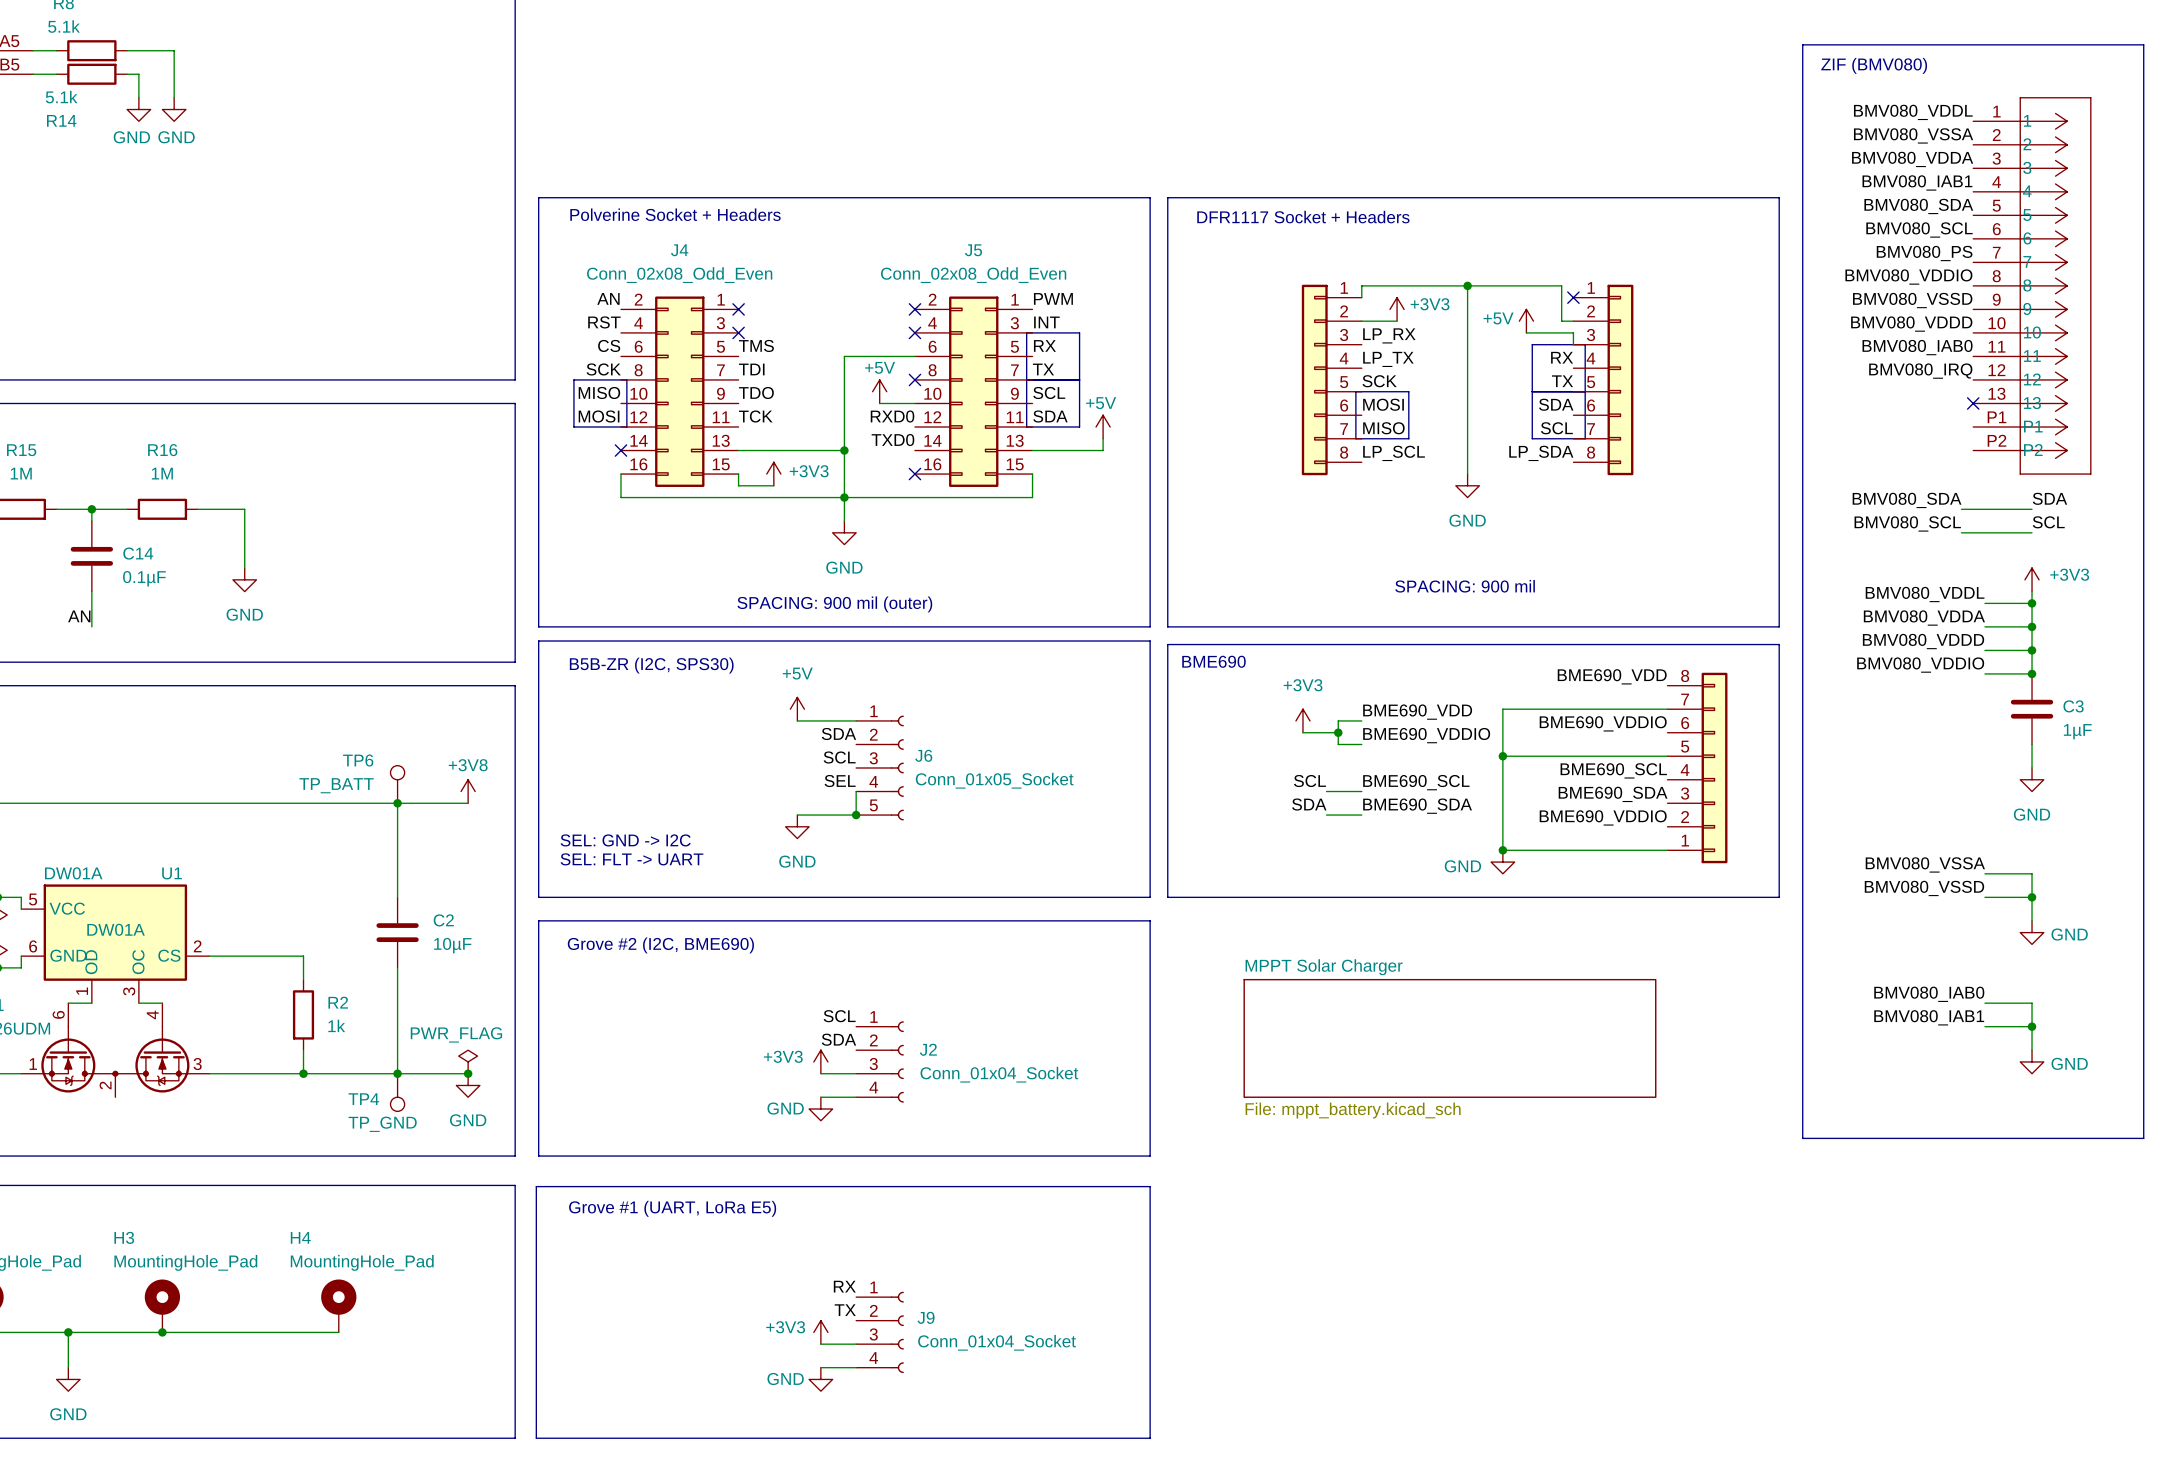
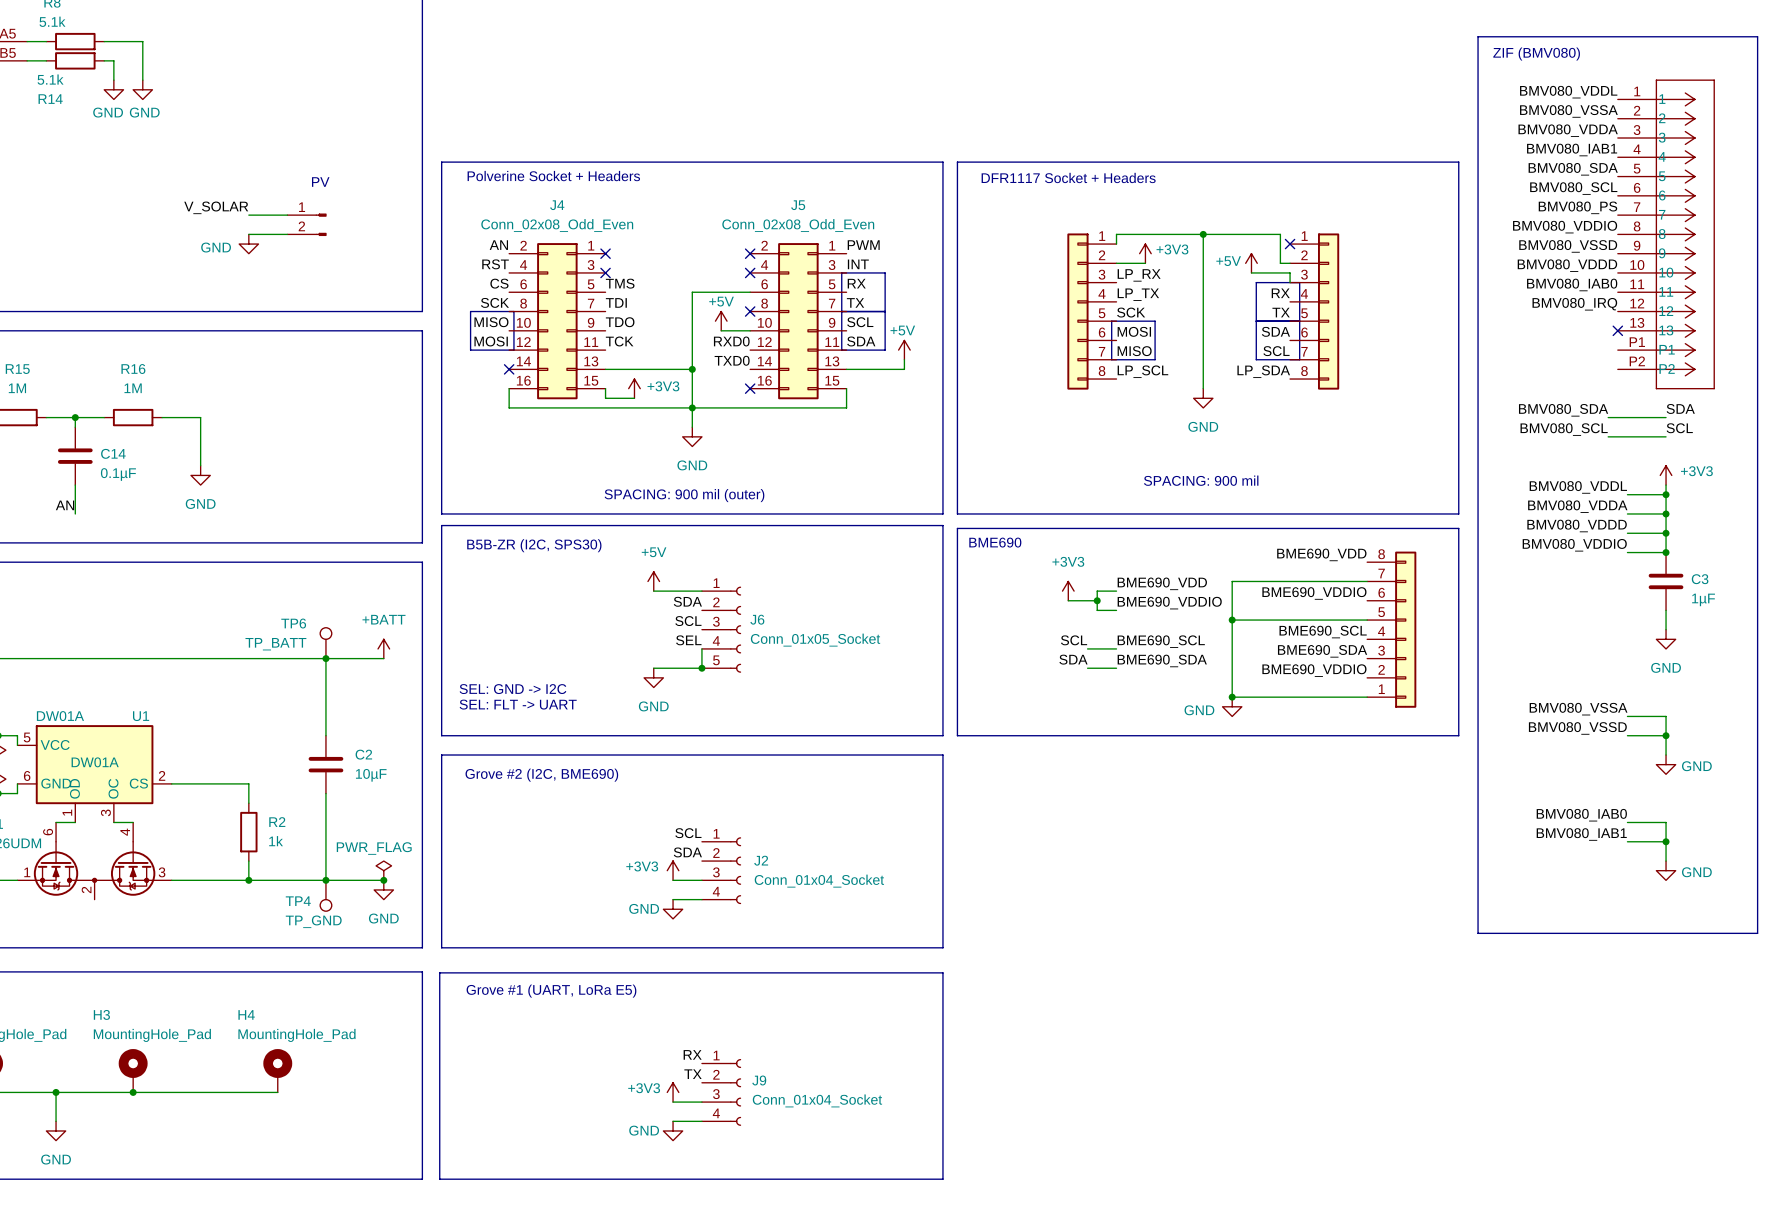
text: none -> PV (320, 182)
label: none -> V_SOLAR (216, 207)
wire: none -> (248, 215) (287, 215)
part: none -> (306, 224)
wire: none -> (248, 234) (287, 234)
power symbol: none -> GND (248, 244)
power symbol: +3V8 (468, 791) -> +BATT (383, 648)
sheet MPPT Solar Charger: File: mppt_battery.kicad_sch (1449, 1038) -> none

